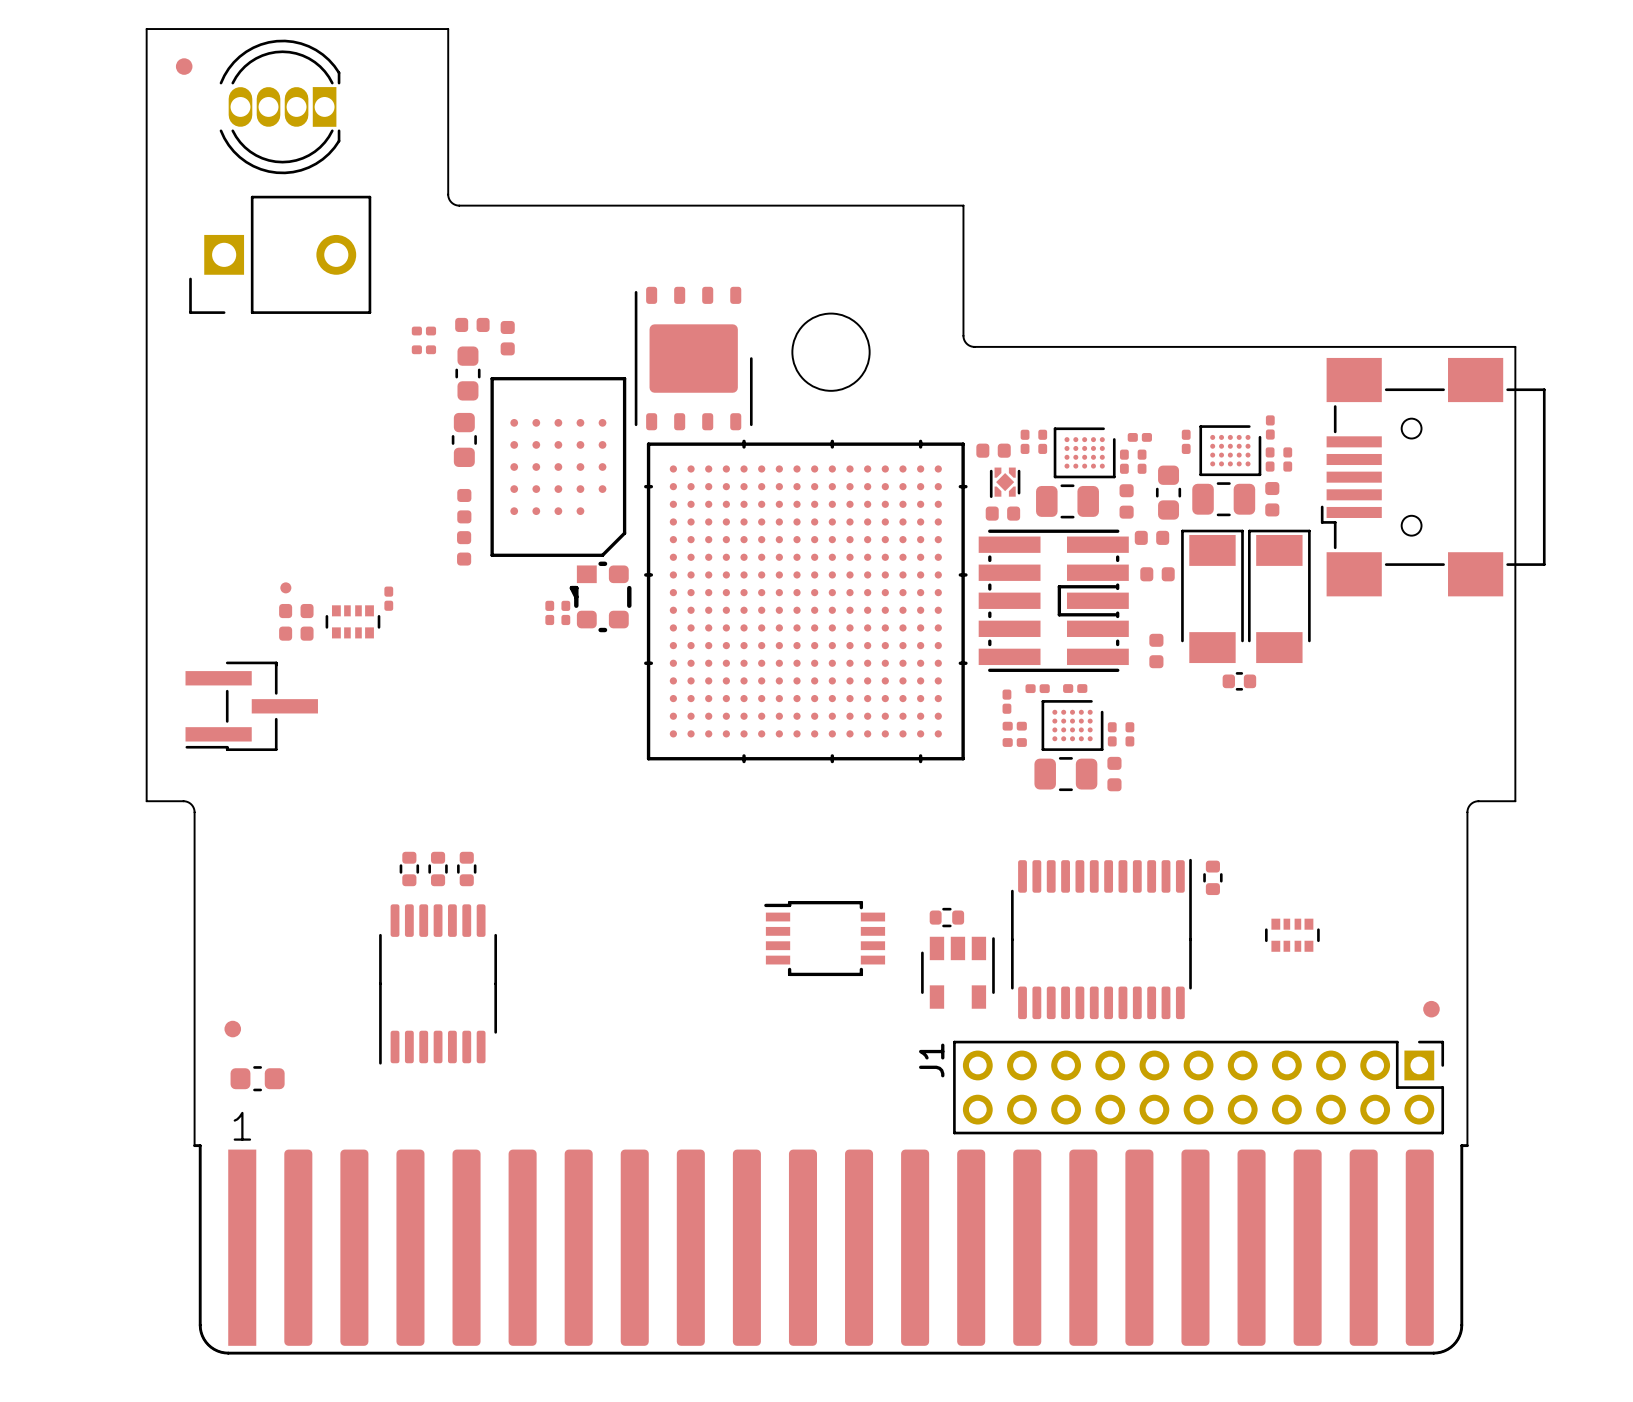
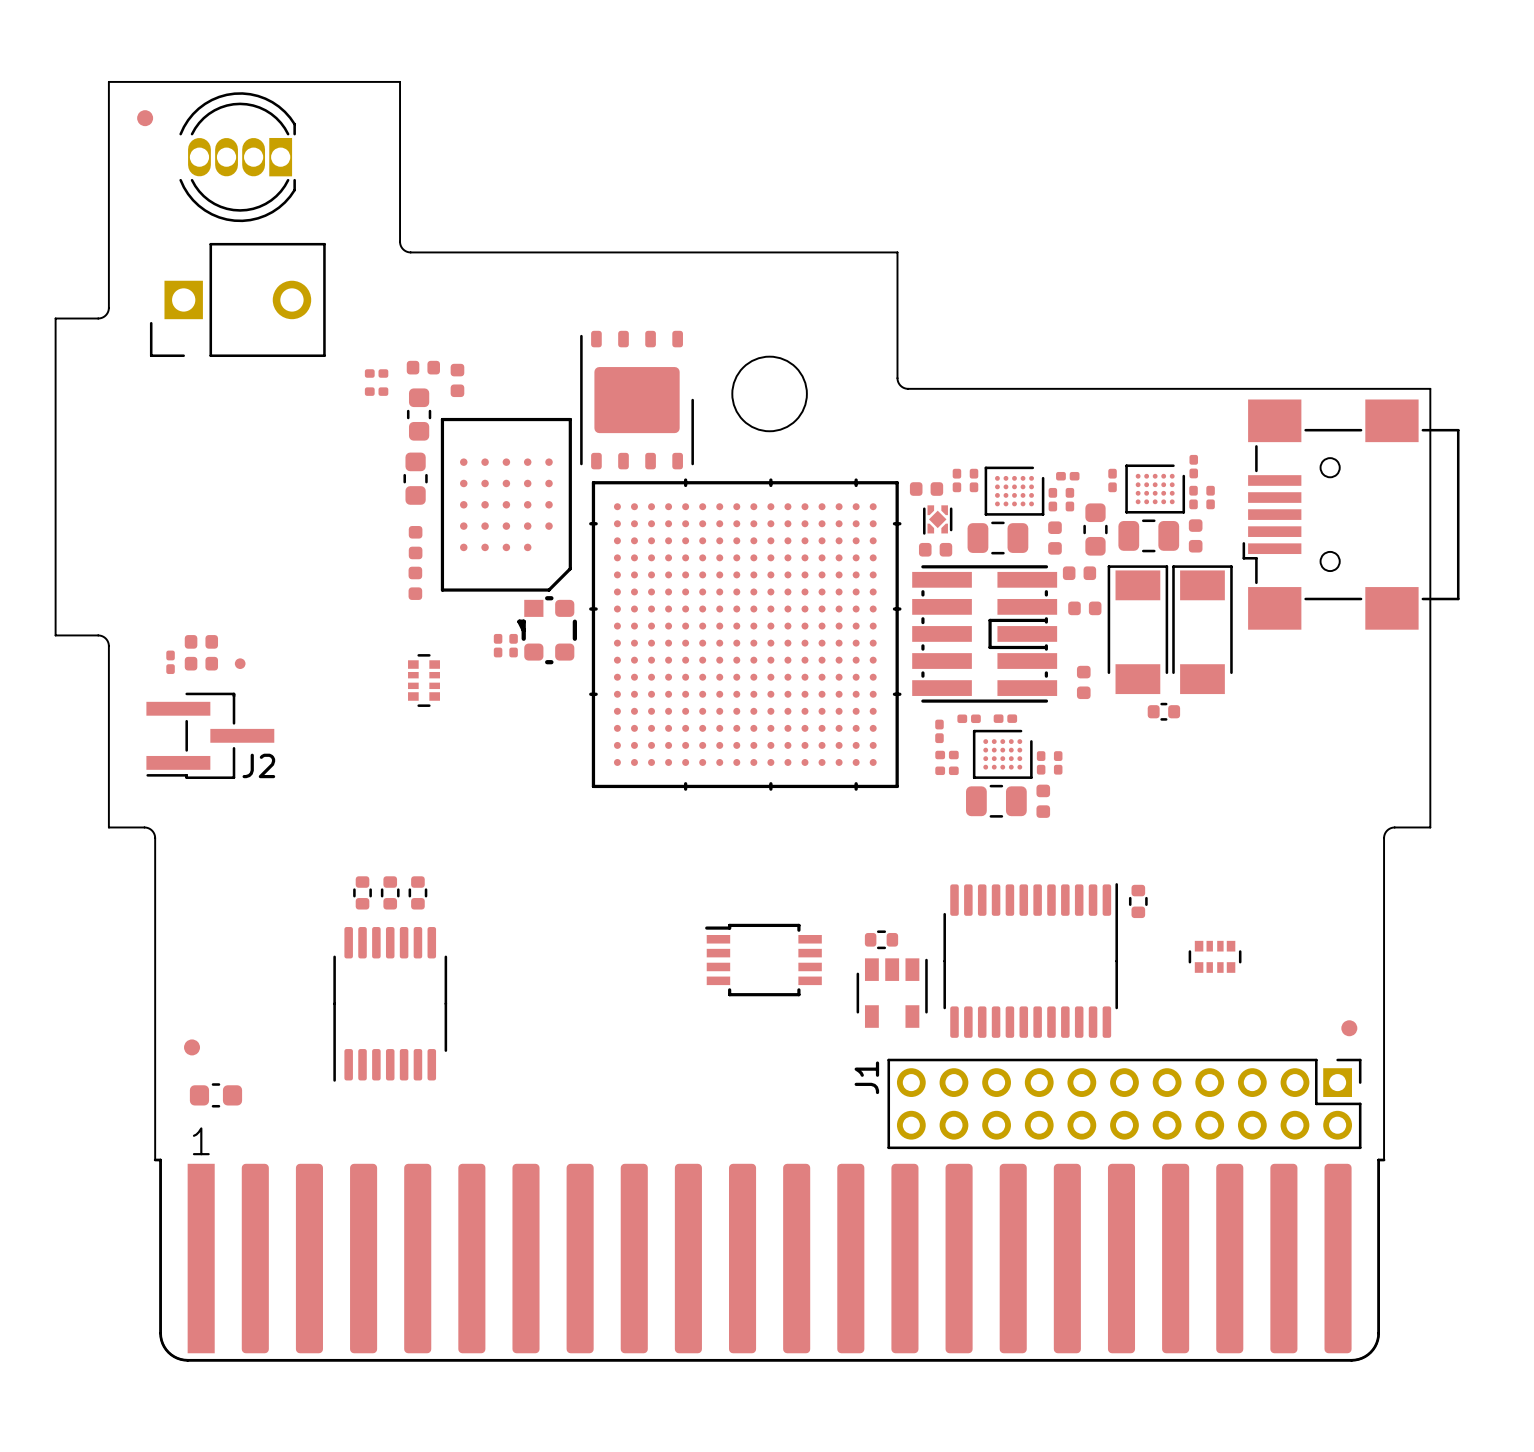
board edge: (146, 263) (146, 613) -> (108, 307) (106, 314) (100, 318) (55, 318) (55, 635) (100, 635) (106, 639) (108, 646)
part position: (285, 587) -> (240, 663)
part position: (388, 598) -> (170, 662)
part: none -> (201, 641)
part: (296, 611) -> none
part rotation: 0° (352, 621) -> 90° clockwise (424, 680)
part position: (352, 621) -> (424, 680)
part: none -> (201, 663)
part: (296, 633) -> none
J2 name: none -> J2 (258, 765)

